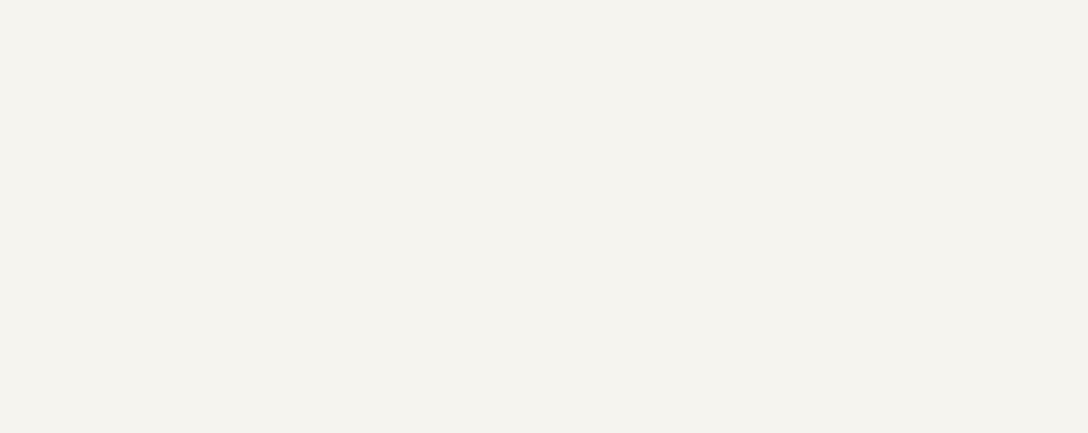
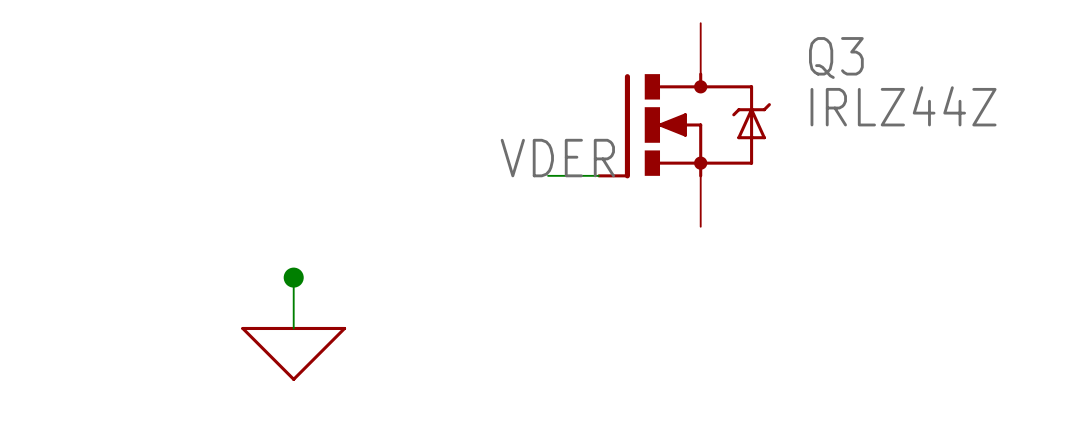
Q3: none -> IRLZ44Z (684, 124)
label: none -> VDER (557, 158)
wire: none -> (548, 175) (598, 175)
wire: none -> (293, 277) (293, 328)
junction: none -> (293, 277)
power symbol: none -> (293, 353)

